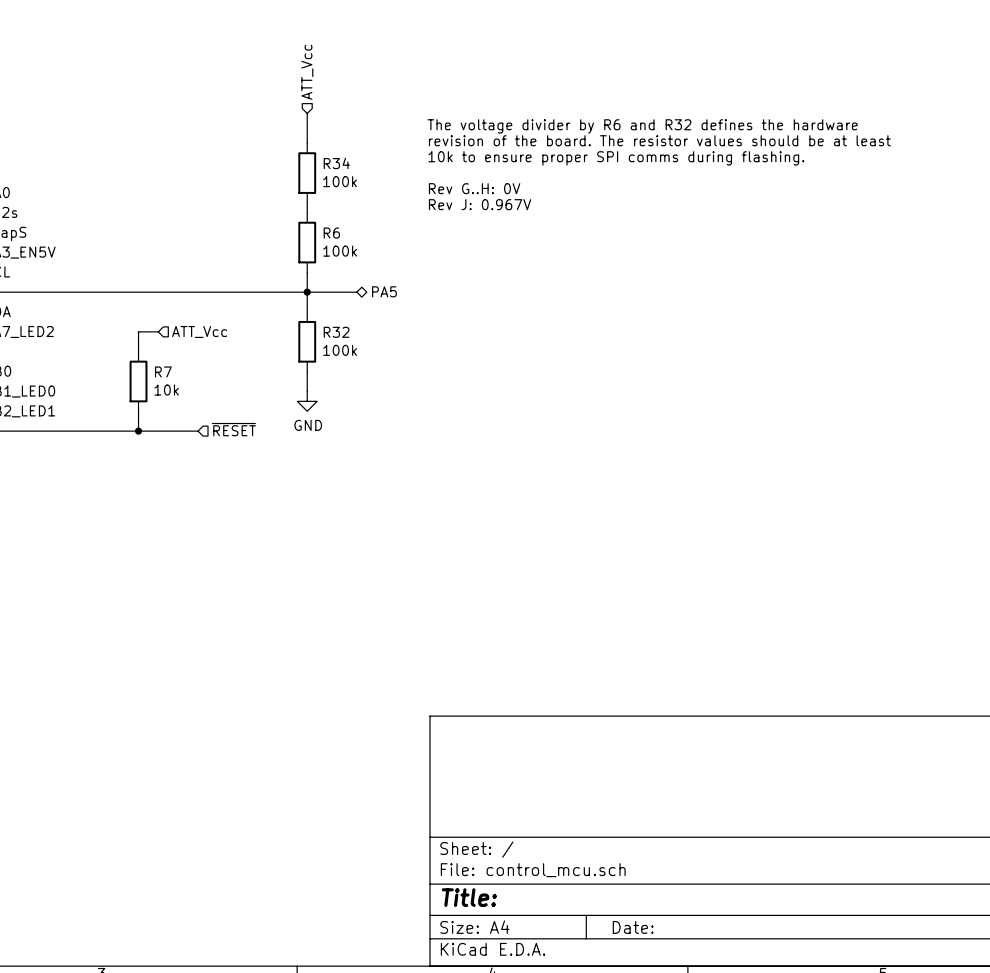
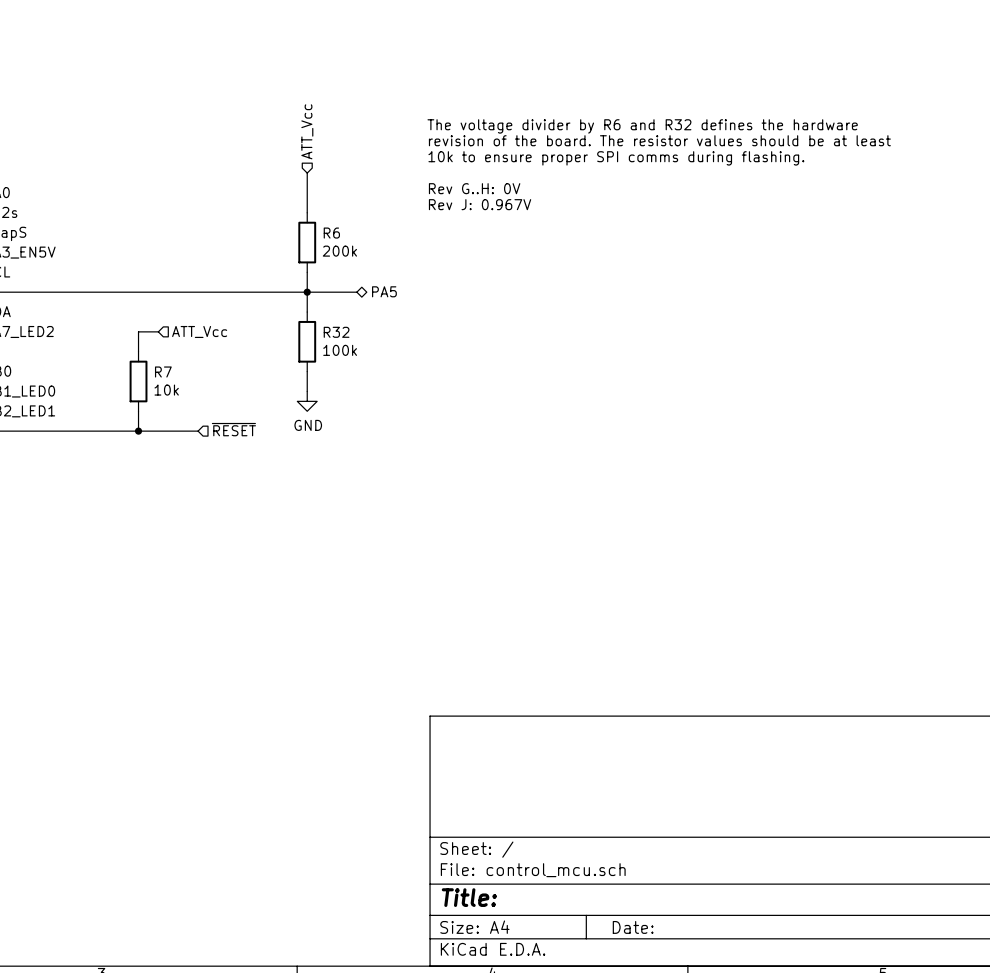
hierarchical label position: ATT_Vcc (307, 72) -> ATT_Vcc (307, 131)
wire: (307, 113) (307, 143) -> (307, 173) (307, 202)
R34: 100k (307, 173) -> none
R6 value: 100k (340, 251) -> 200k (339, 251)

